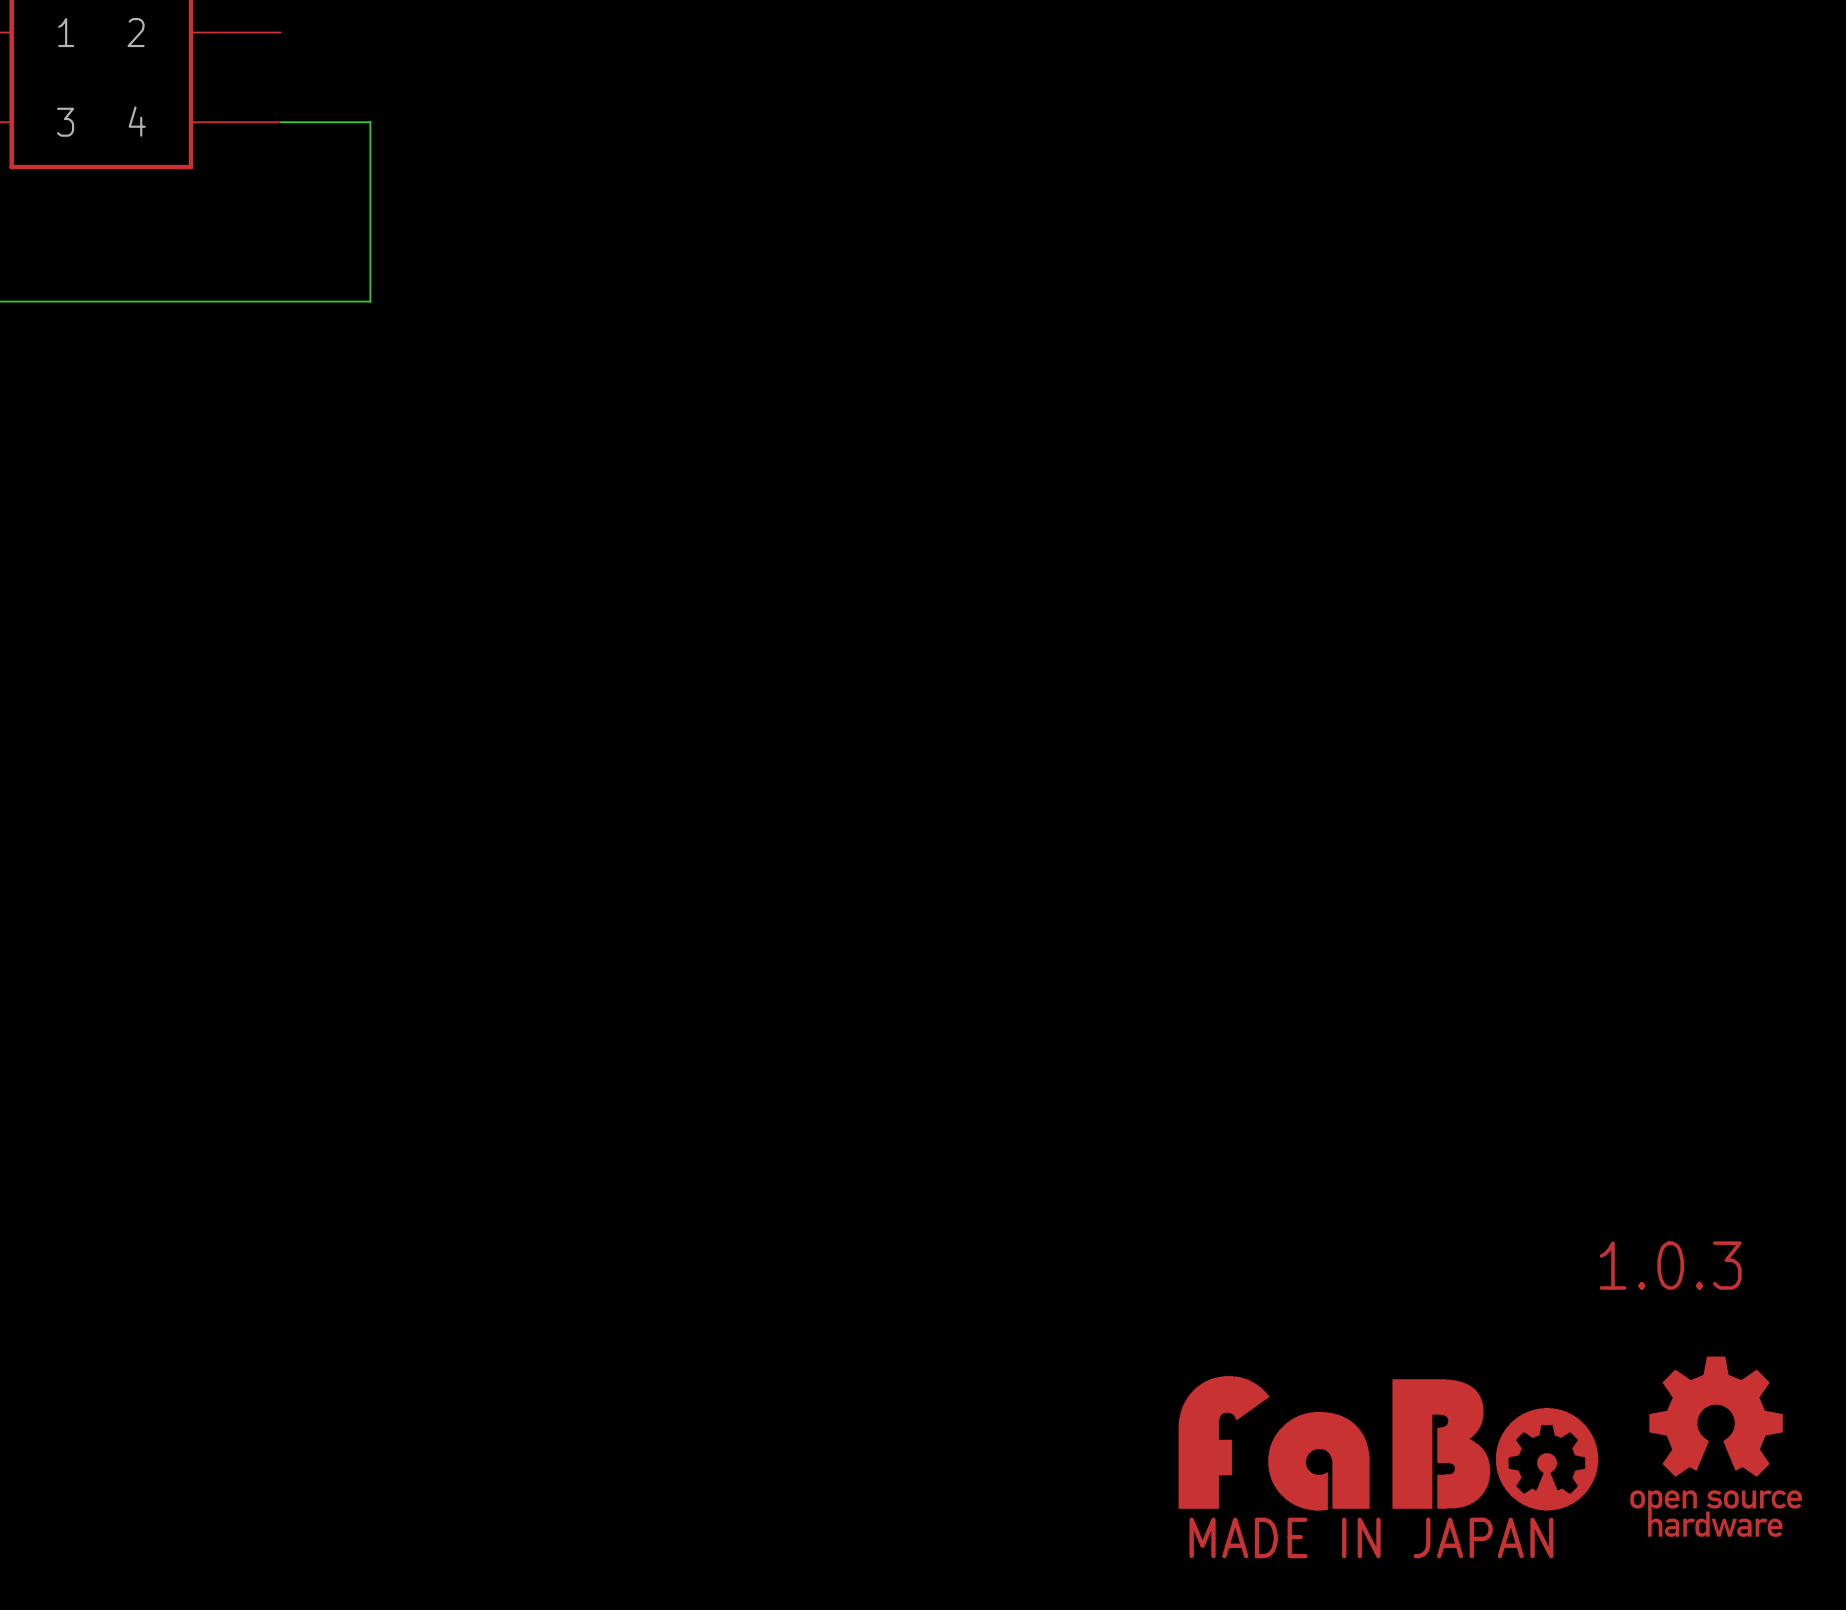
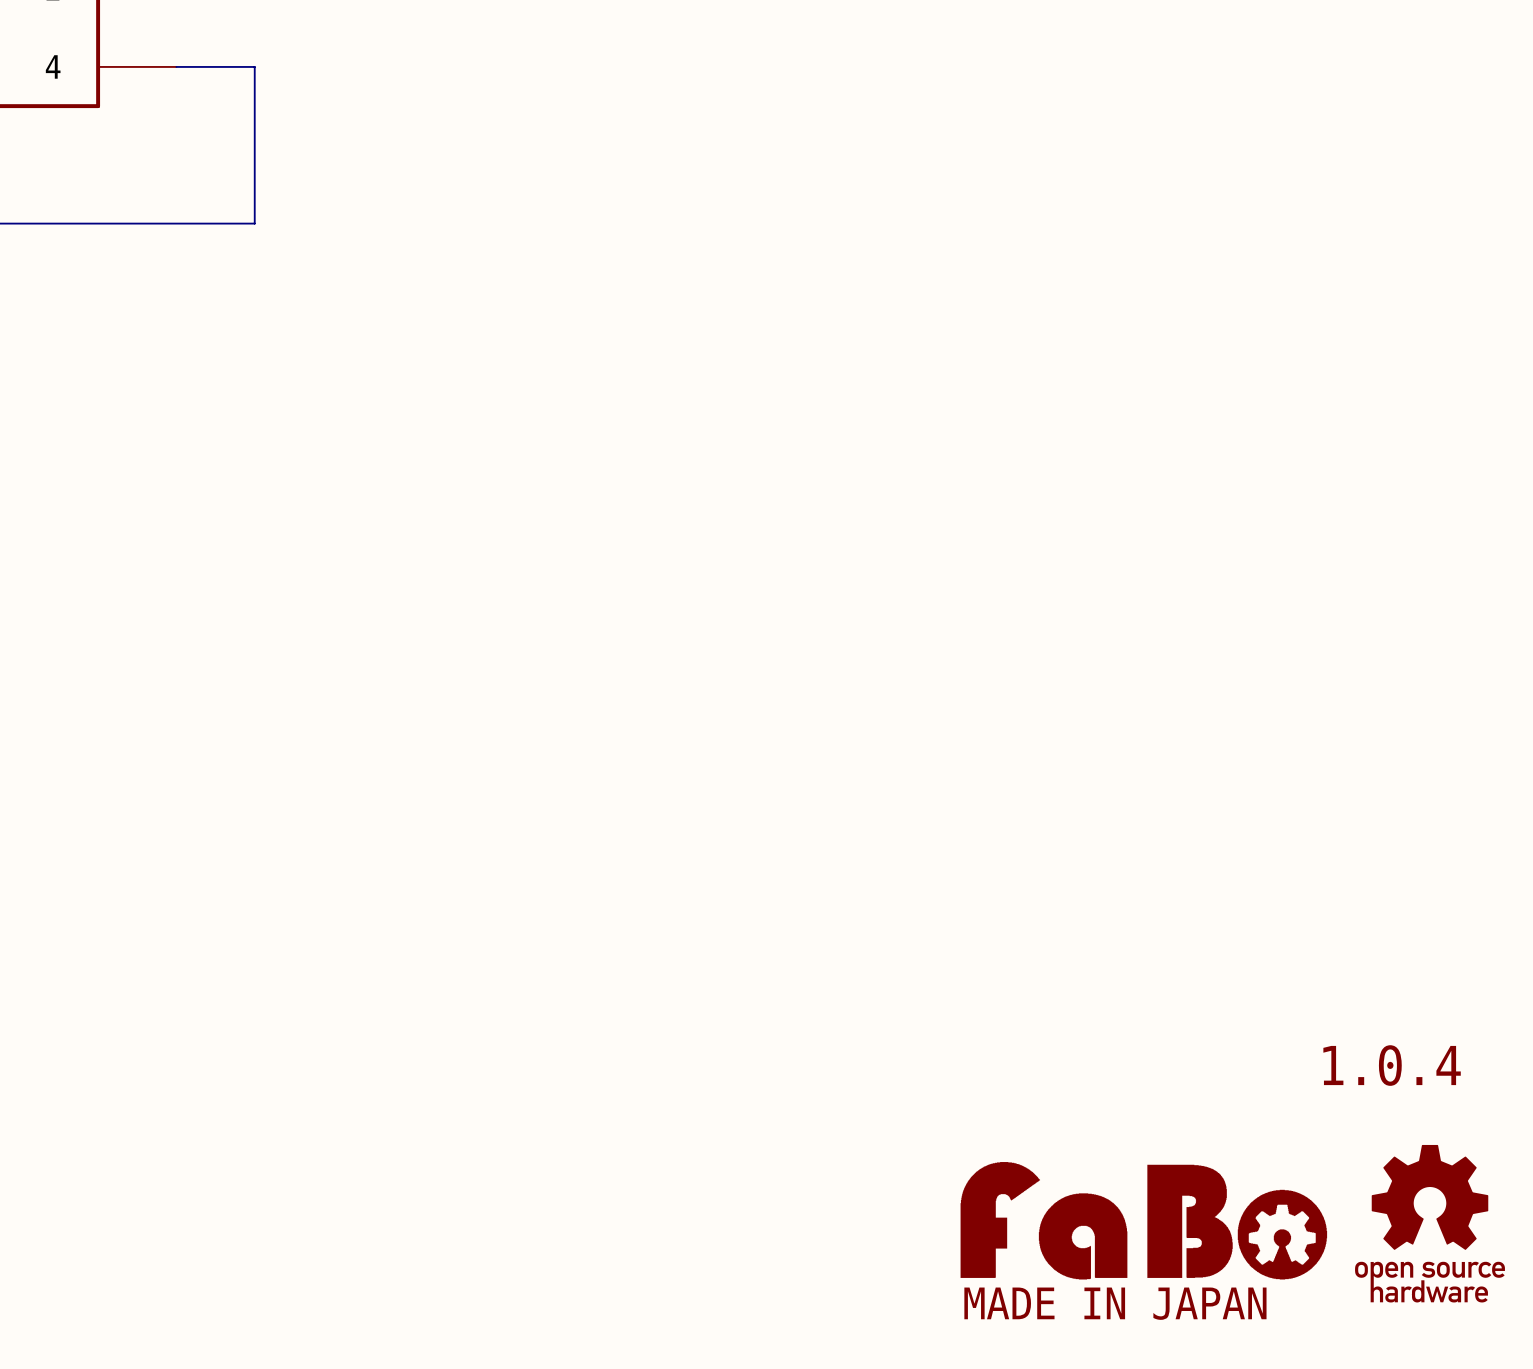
text: 1.0.3 (1670, 1265) -> 1.0.4 (1392, 1065)

